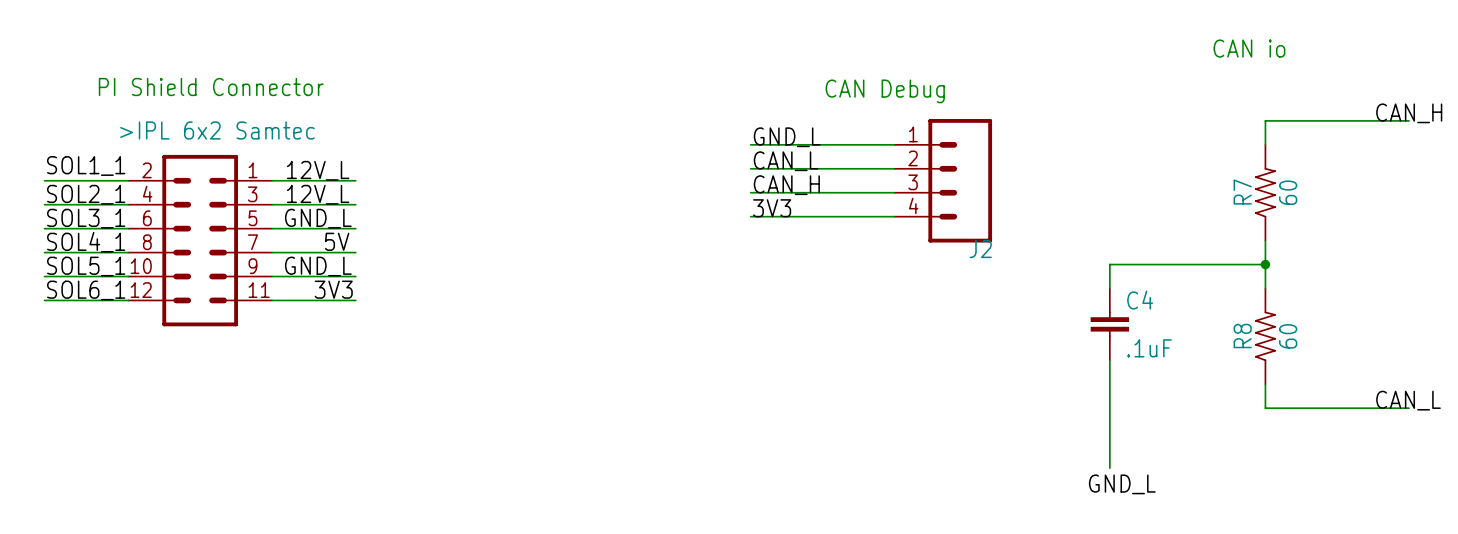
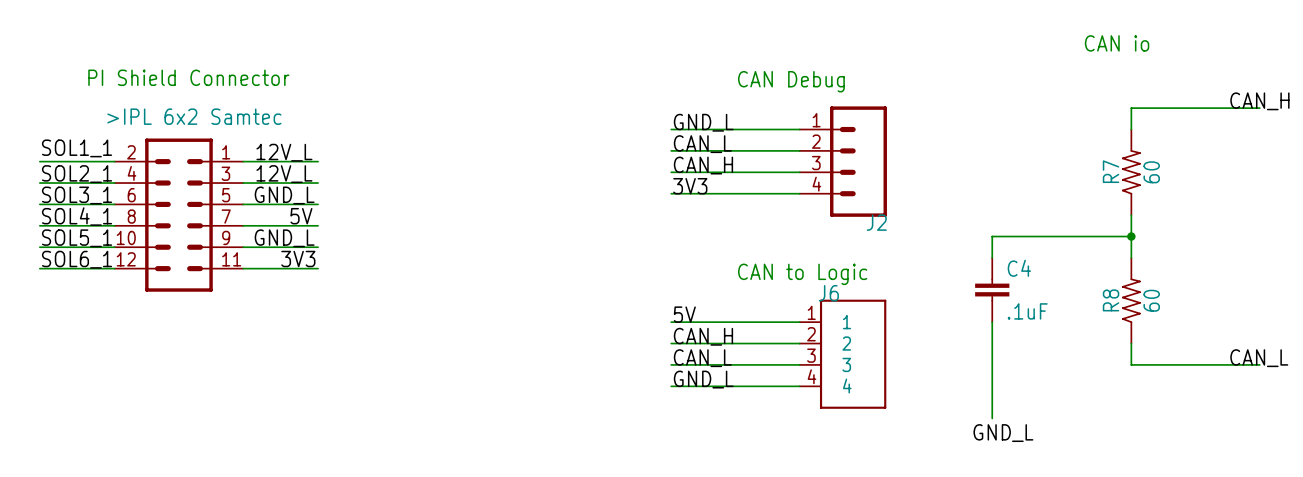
text: none -> CAN to Logic (802, 274)
label: none -> 5V (684, 314)
wire: none -> (671, 322) (799, 322)
label: none -> CAN_H (703, 336)
wire: none -> (671, 343) (799, 343)
J6: none -> (842, 354)
label: none -> CAN_L (702, 358)
wire: none -> (671, 364) (799, 364)
label: none -> GND_L (703, 379)
wire: none -> (671, 386) (799, 386)

